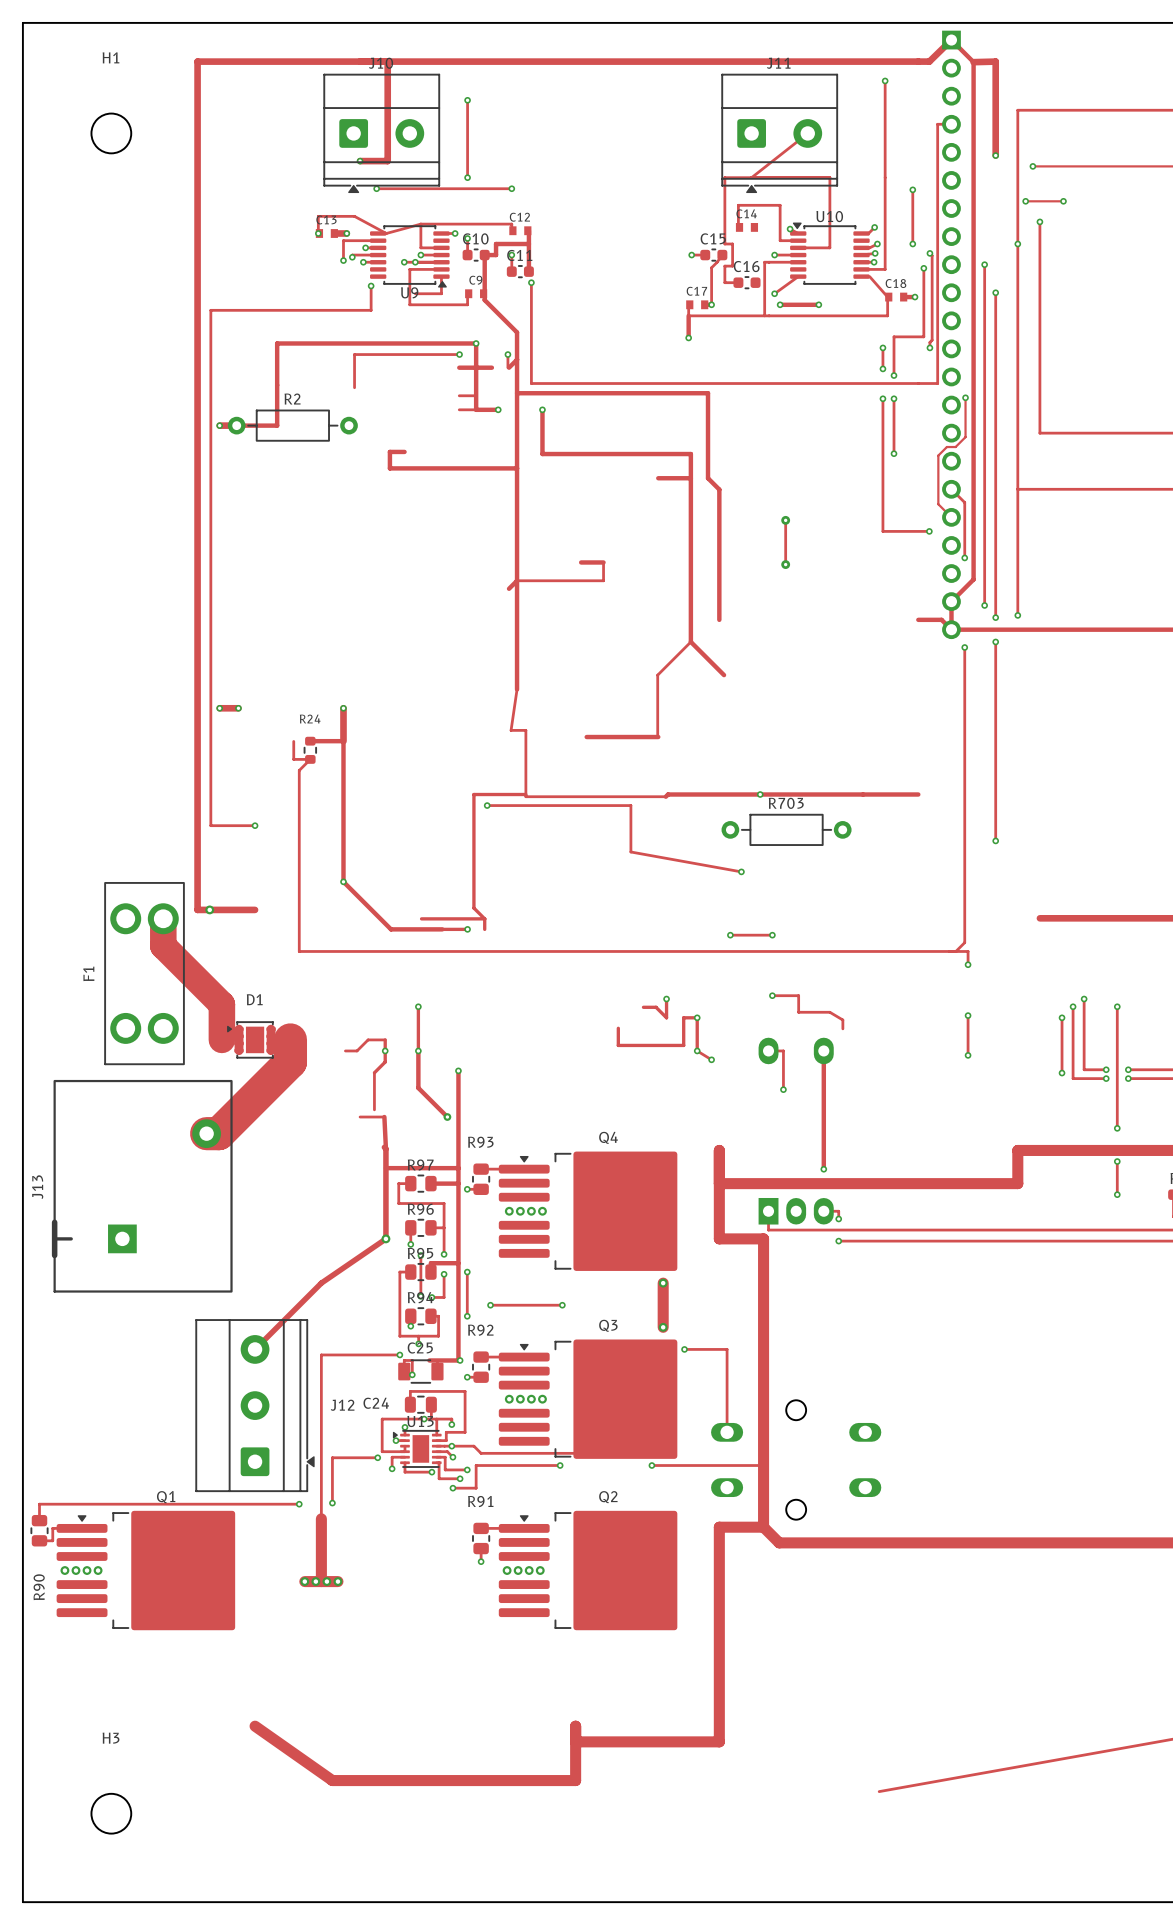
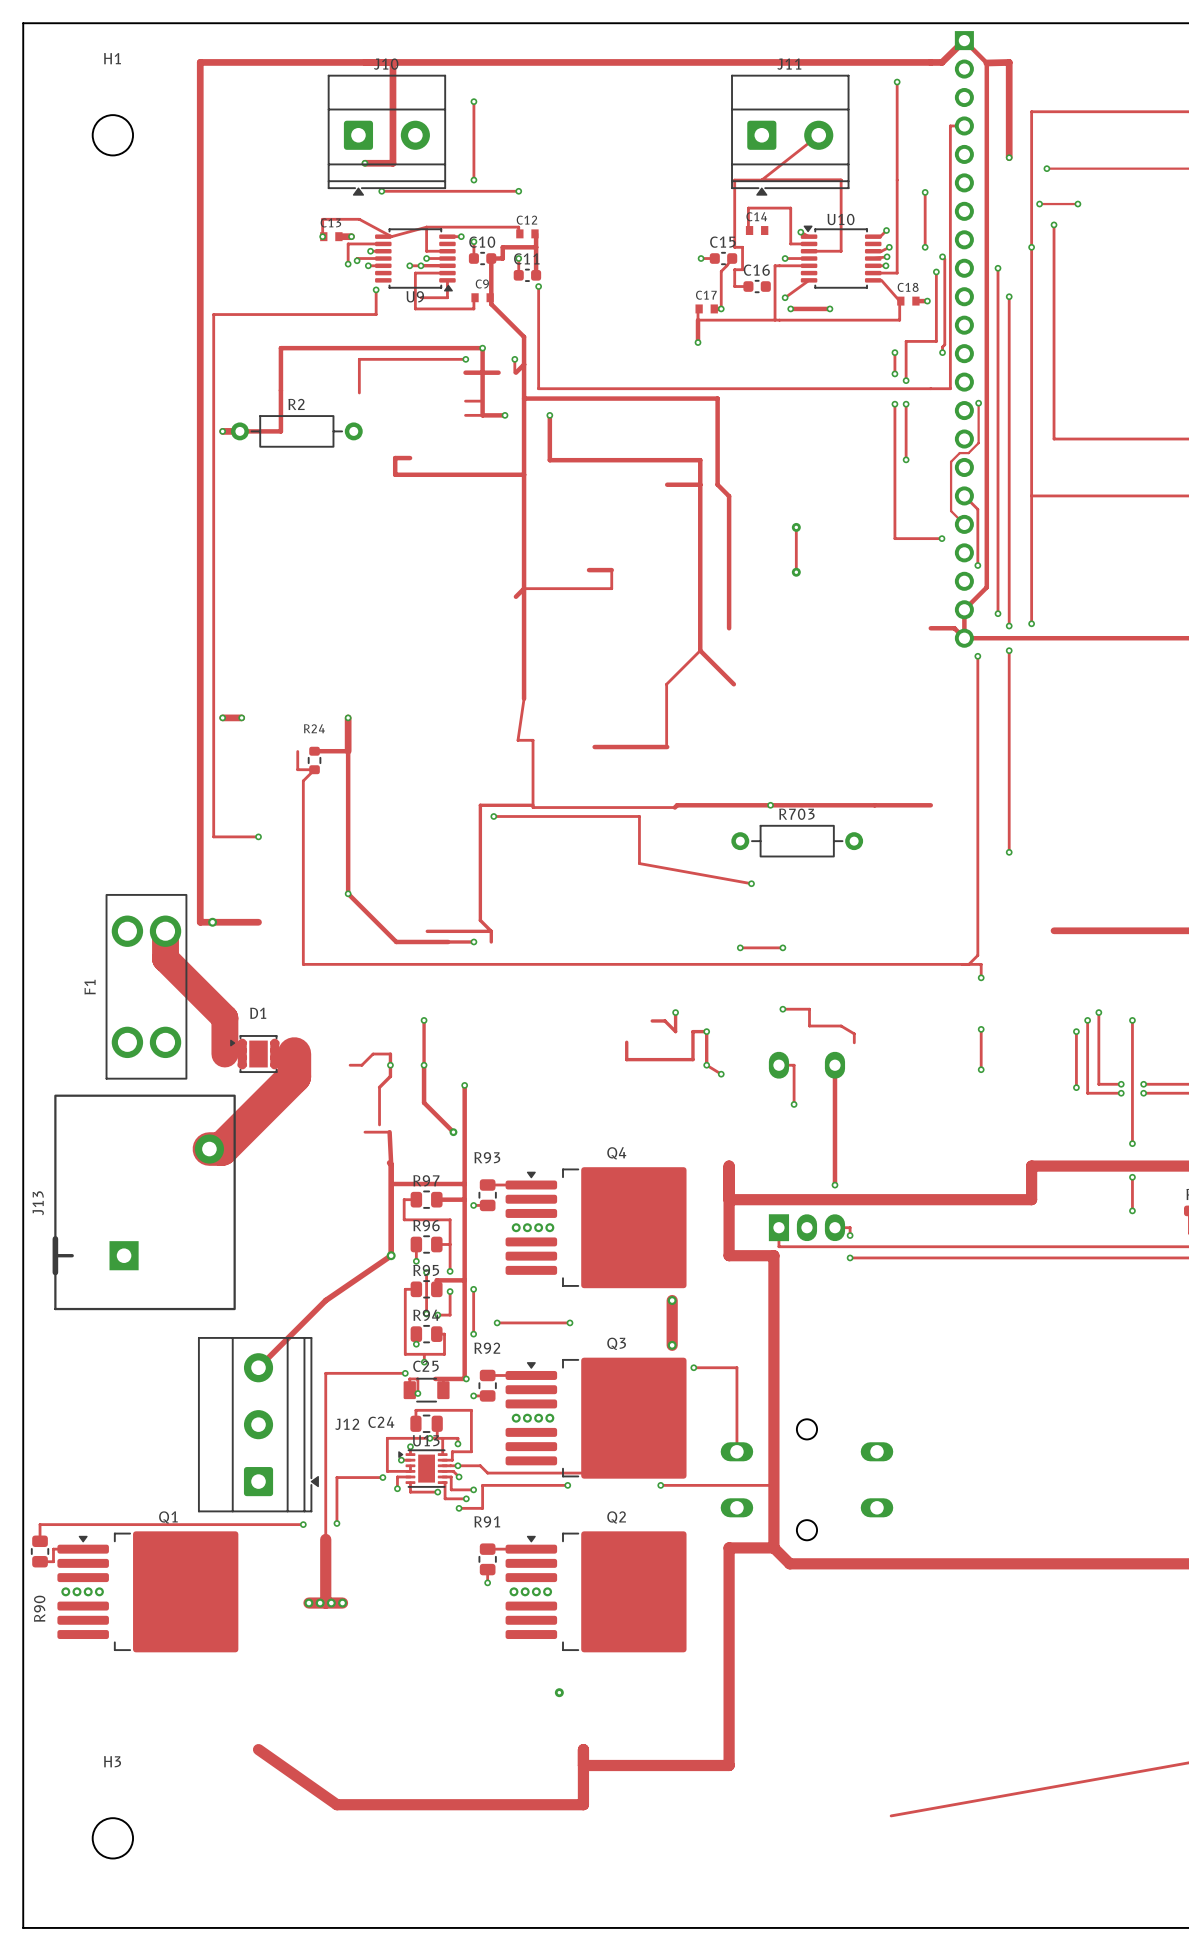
via: none -> (559, 1692)

